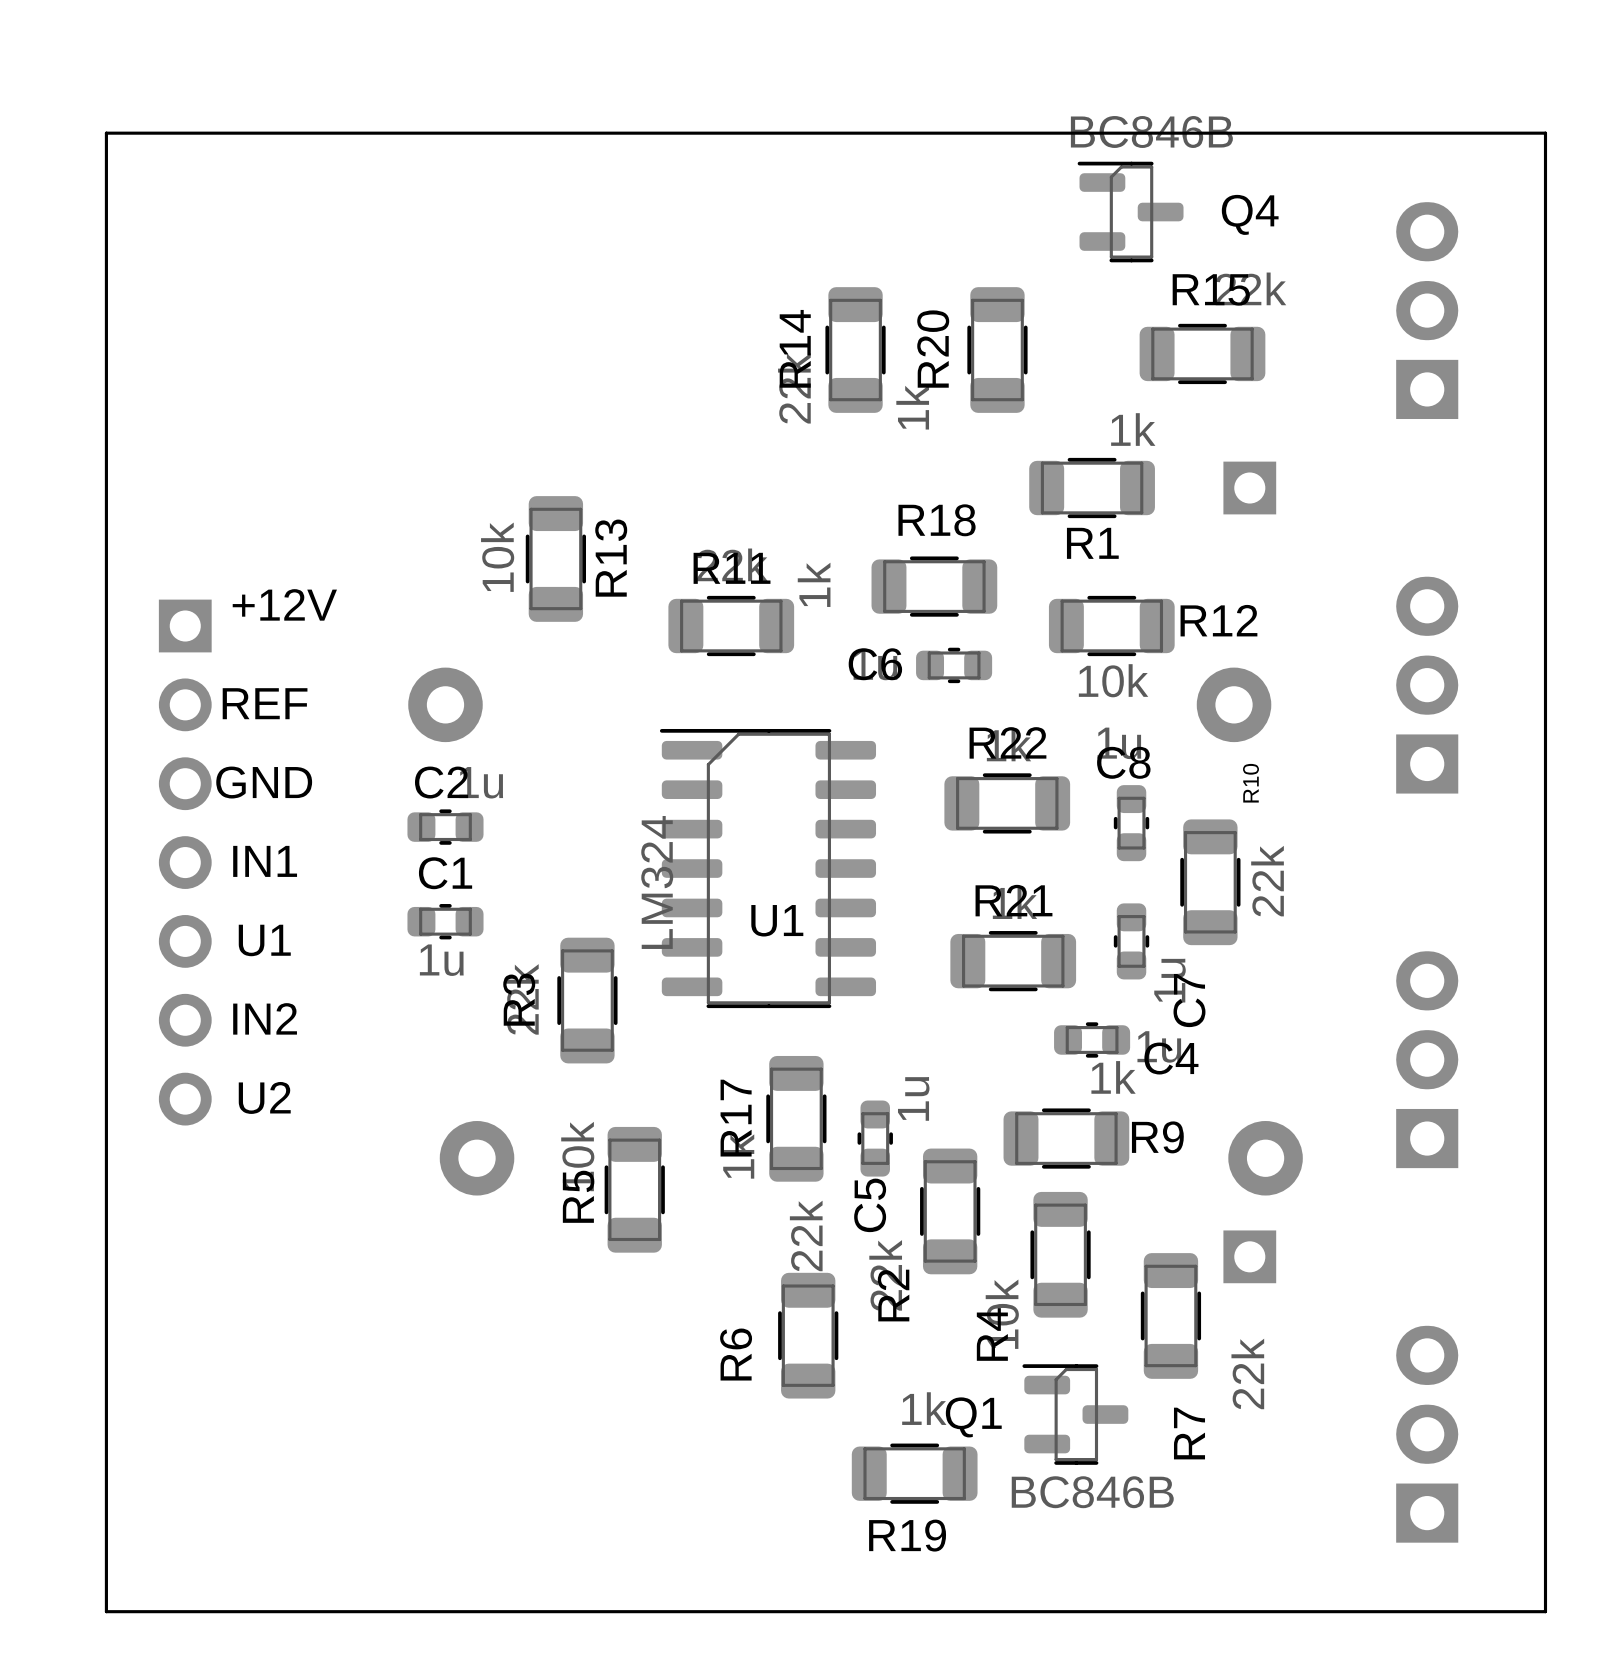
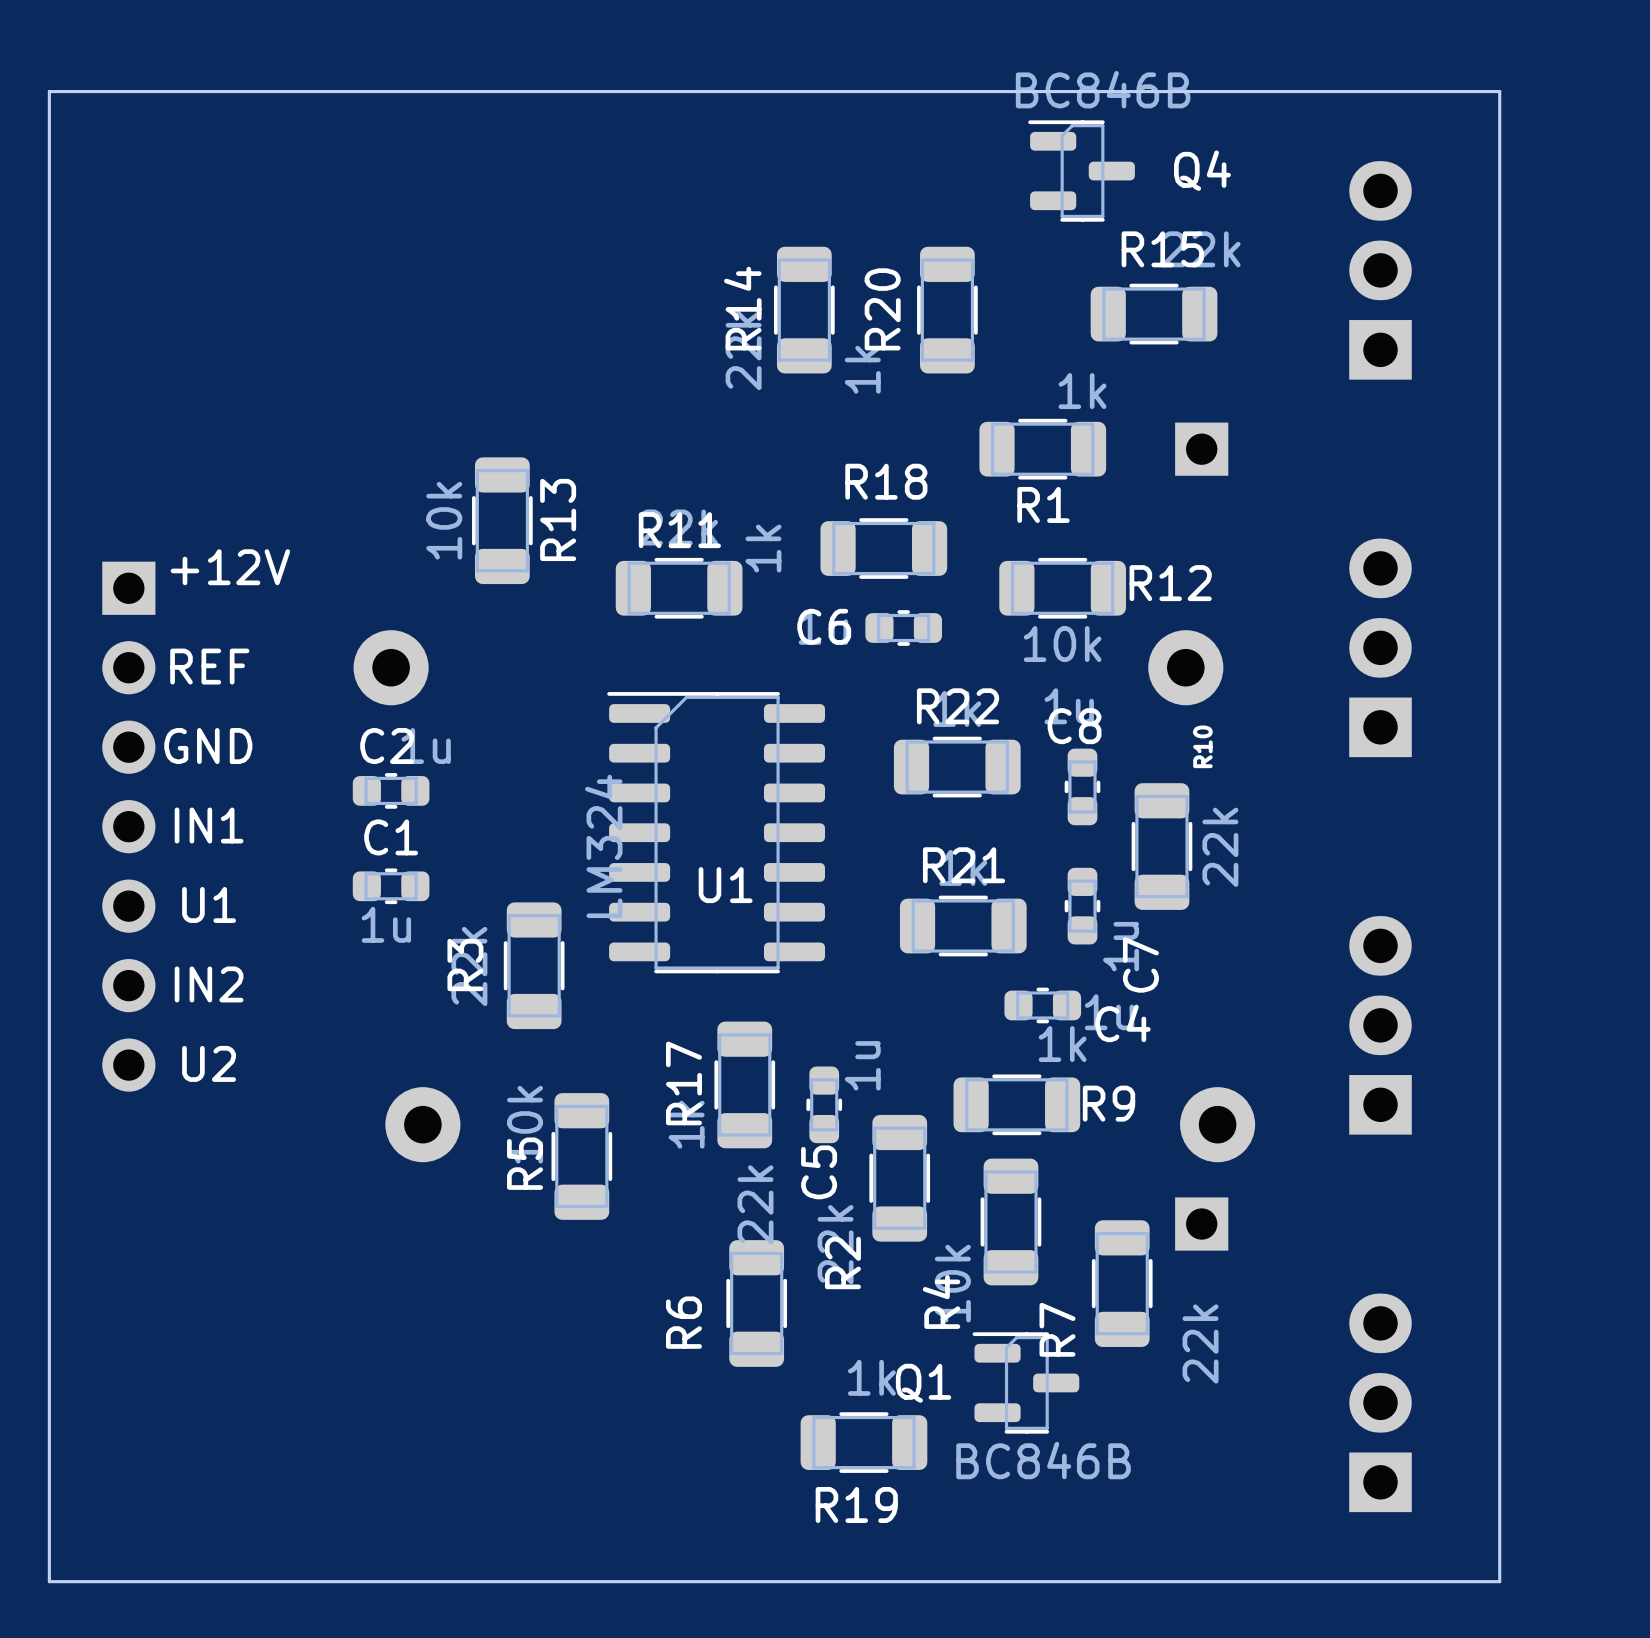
R7 name position: R7 (1189, 1433) -> R7 (1057, 1329)

